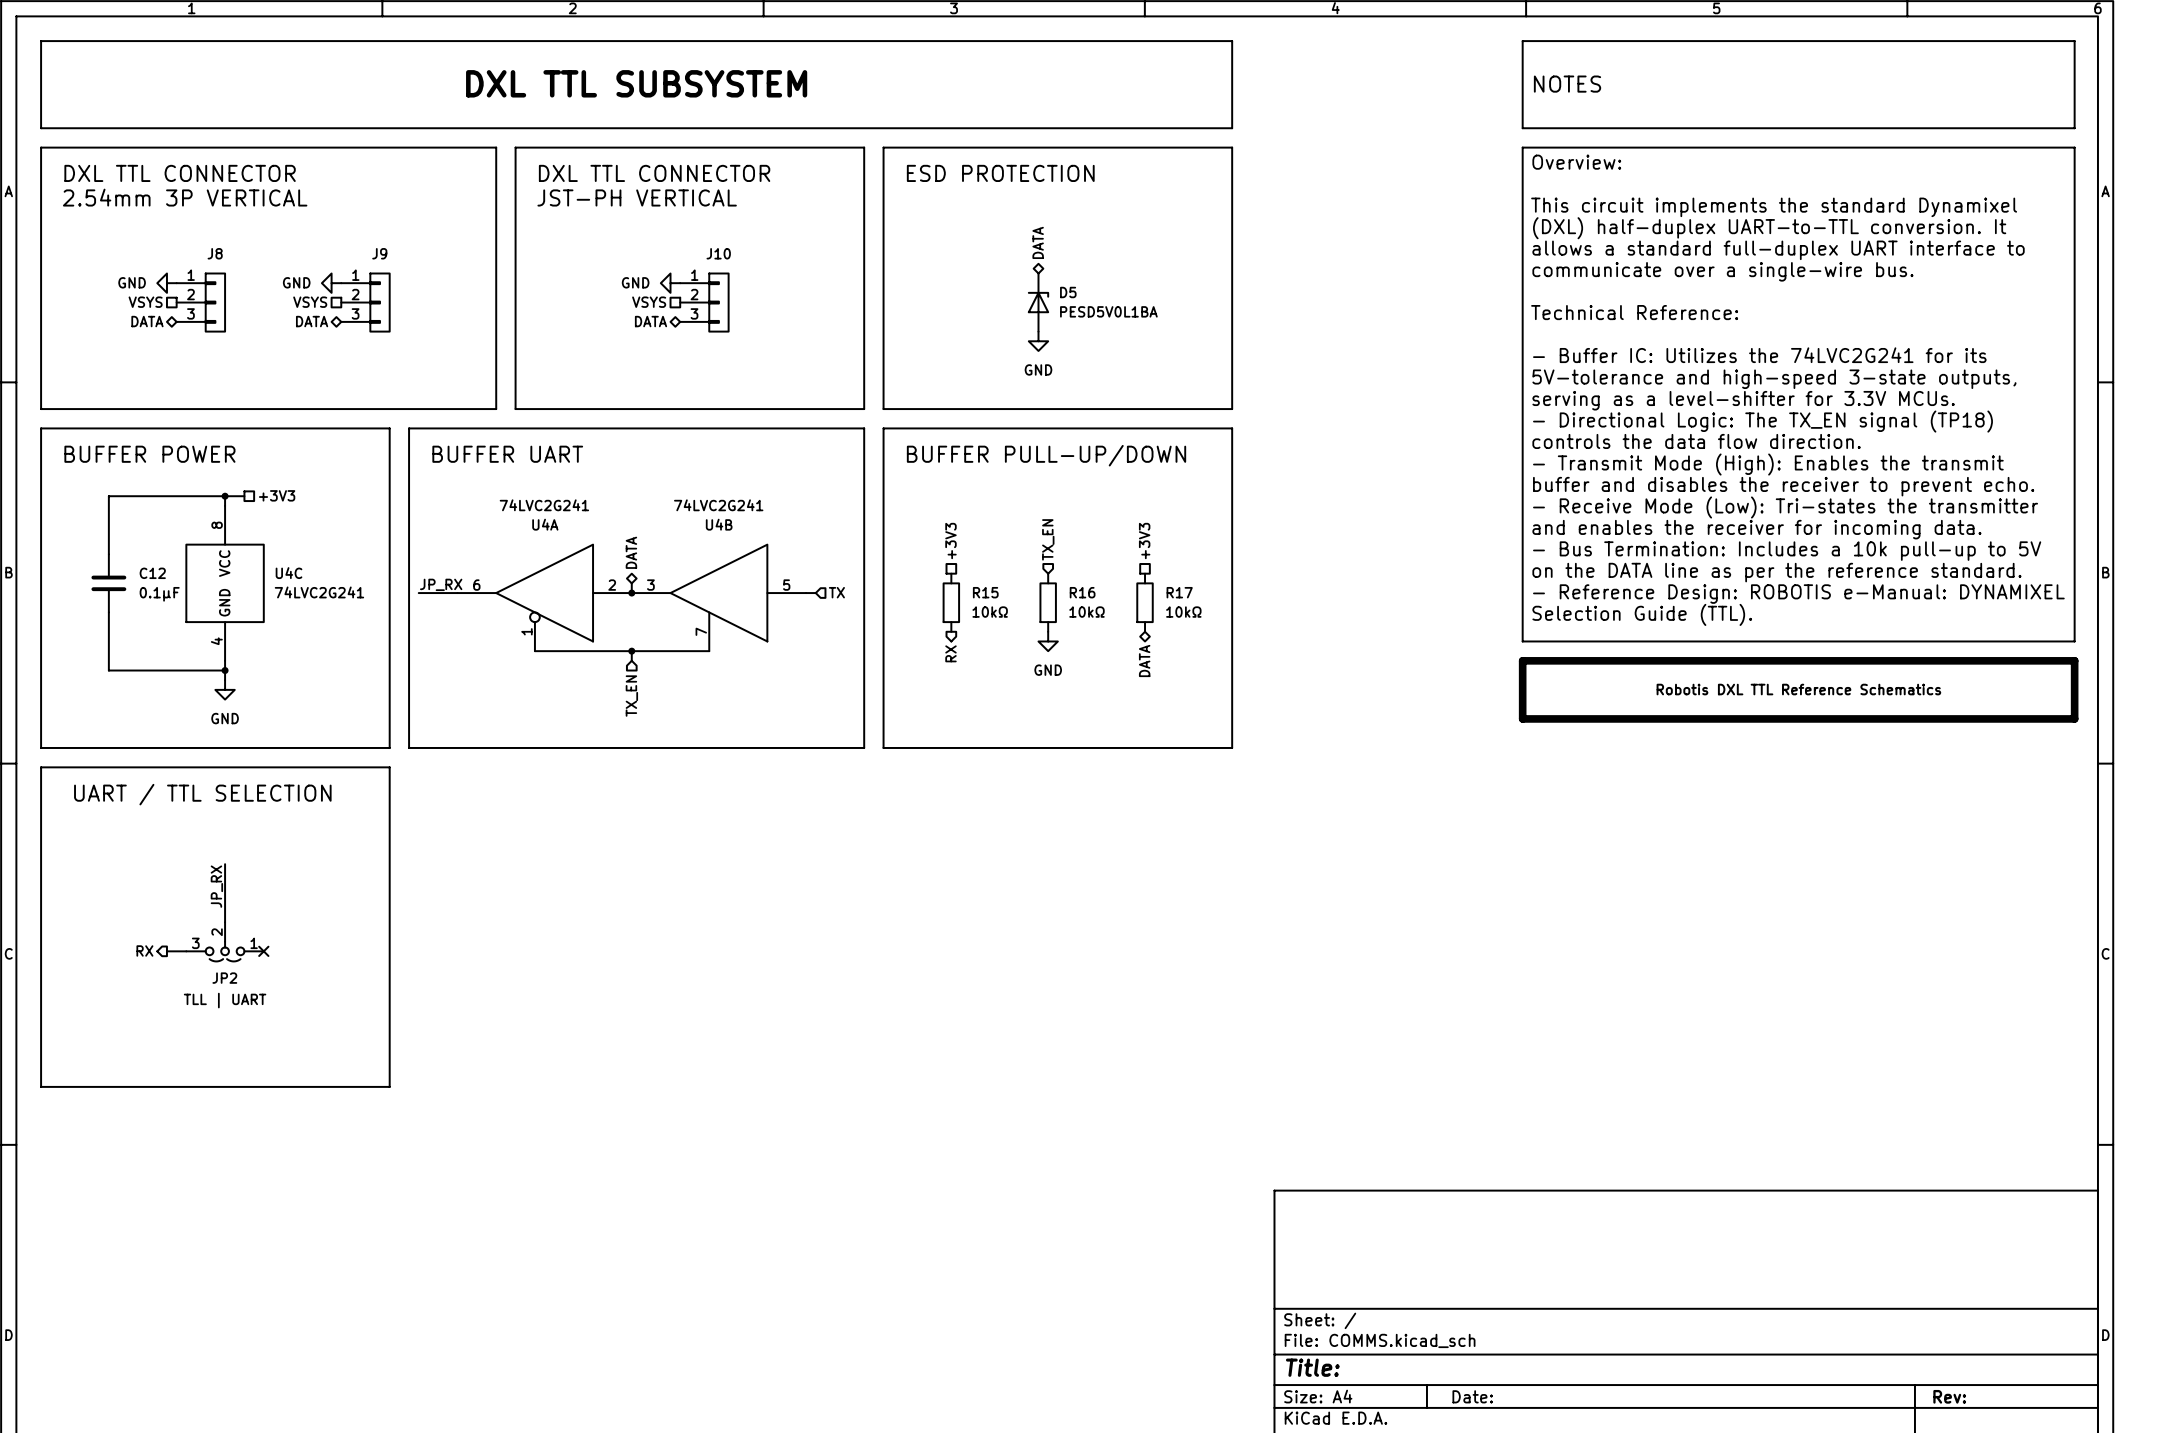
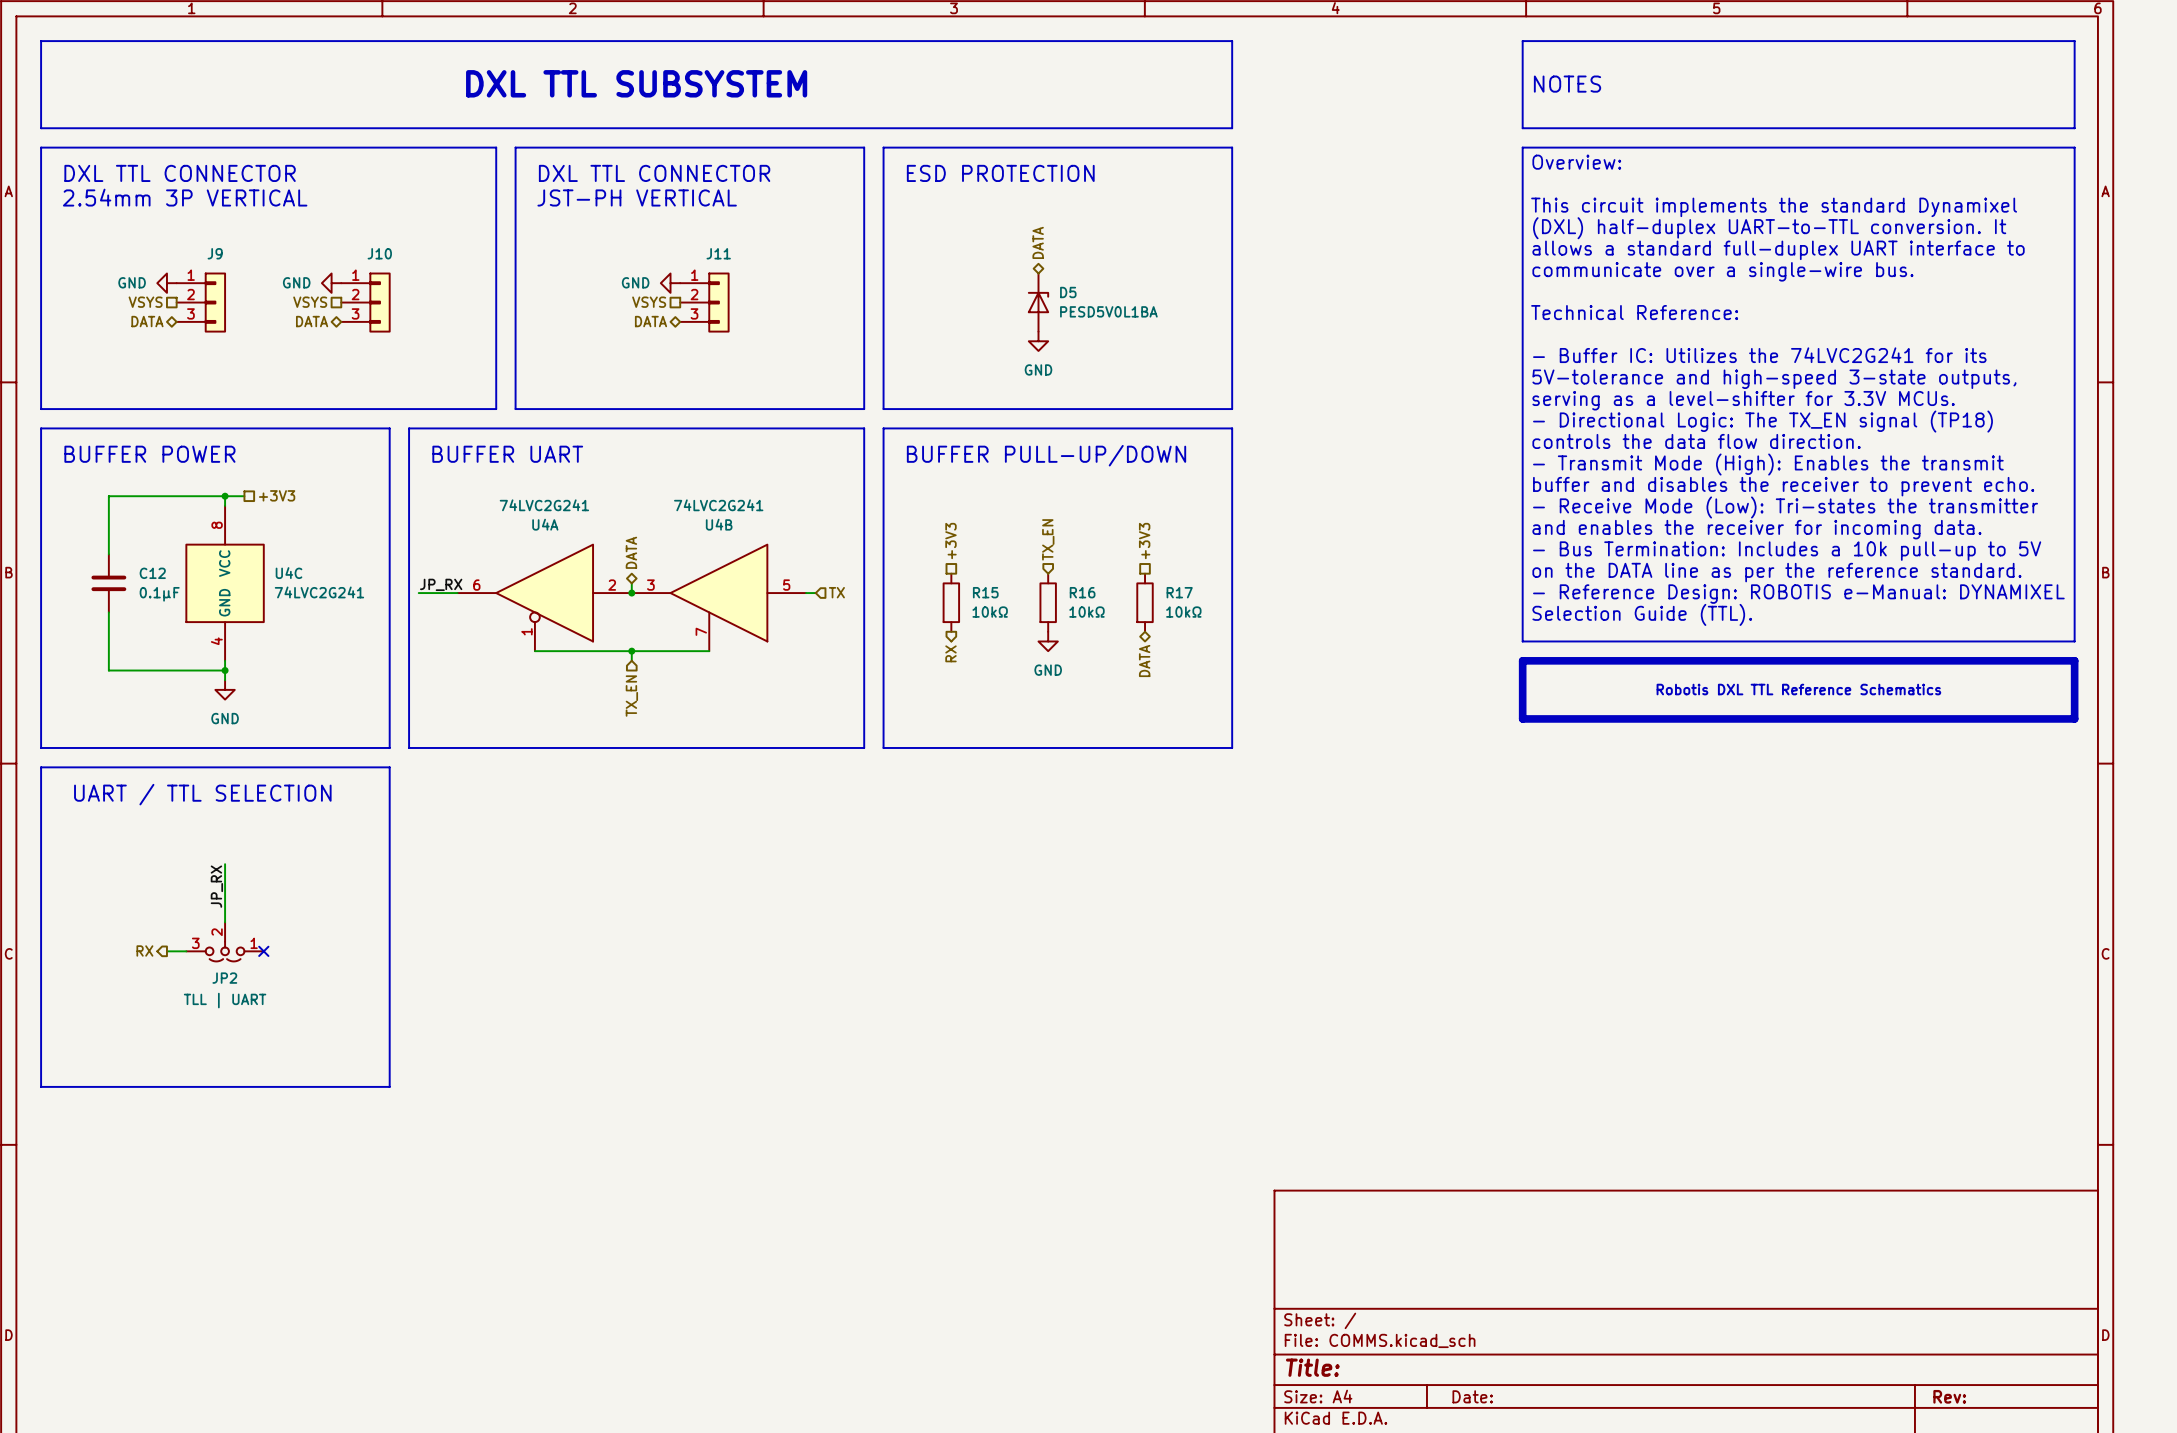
J8 name: J8 (215, 253) -> J9 (215, 253)
J9 name: J9 (379, 253) -> J10 (379, 253)
J10 name: J10 (718, 253) -> J11 (718, 253)

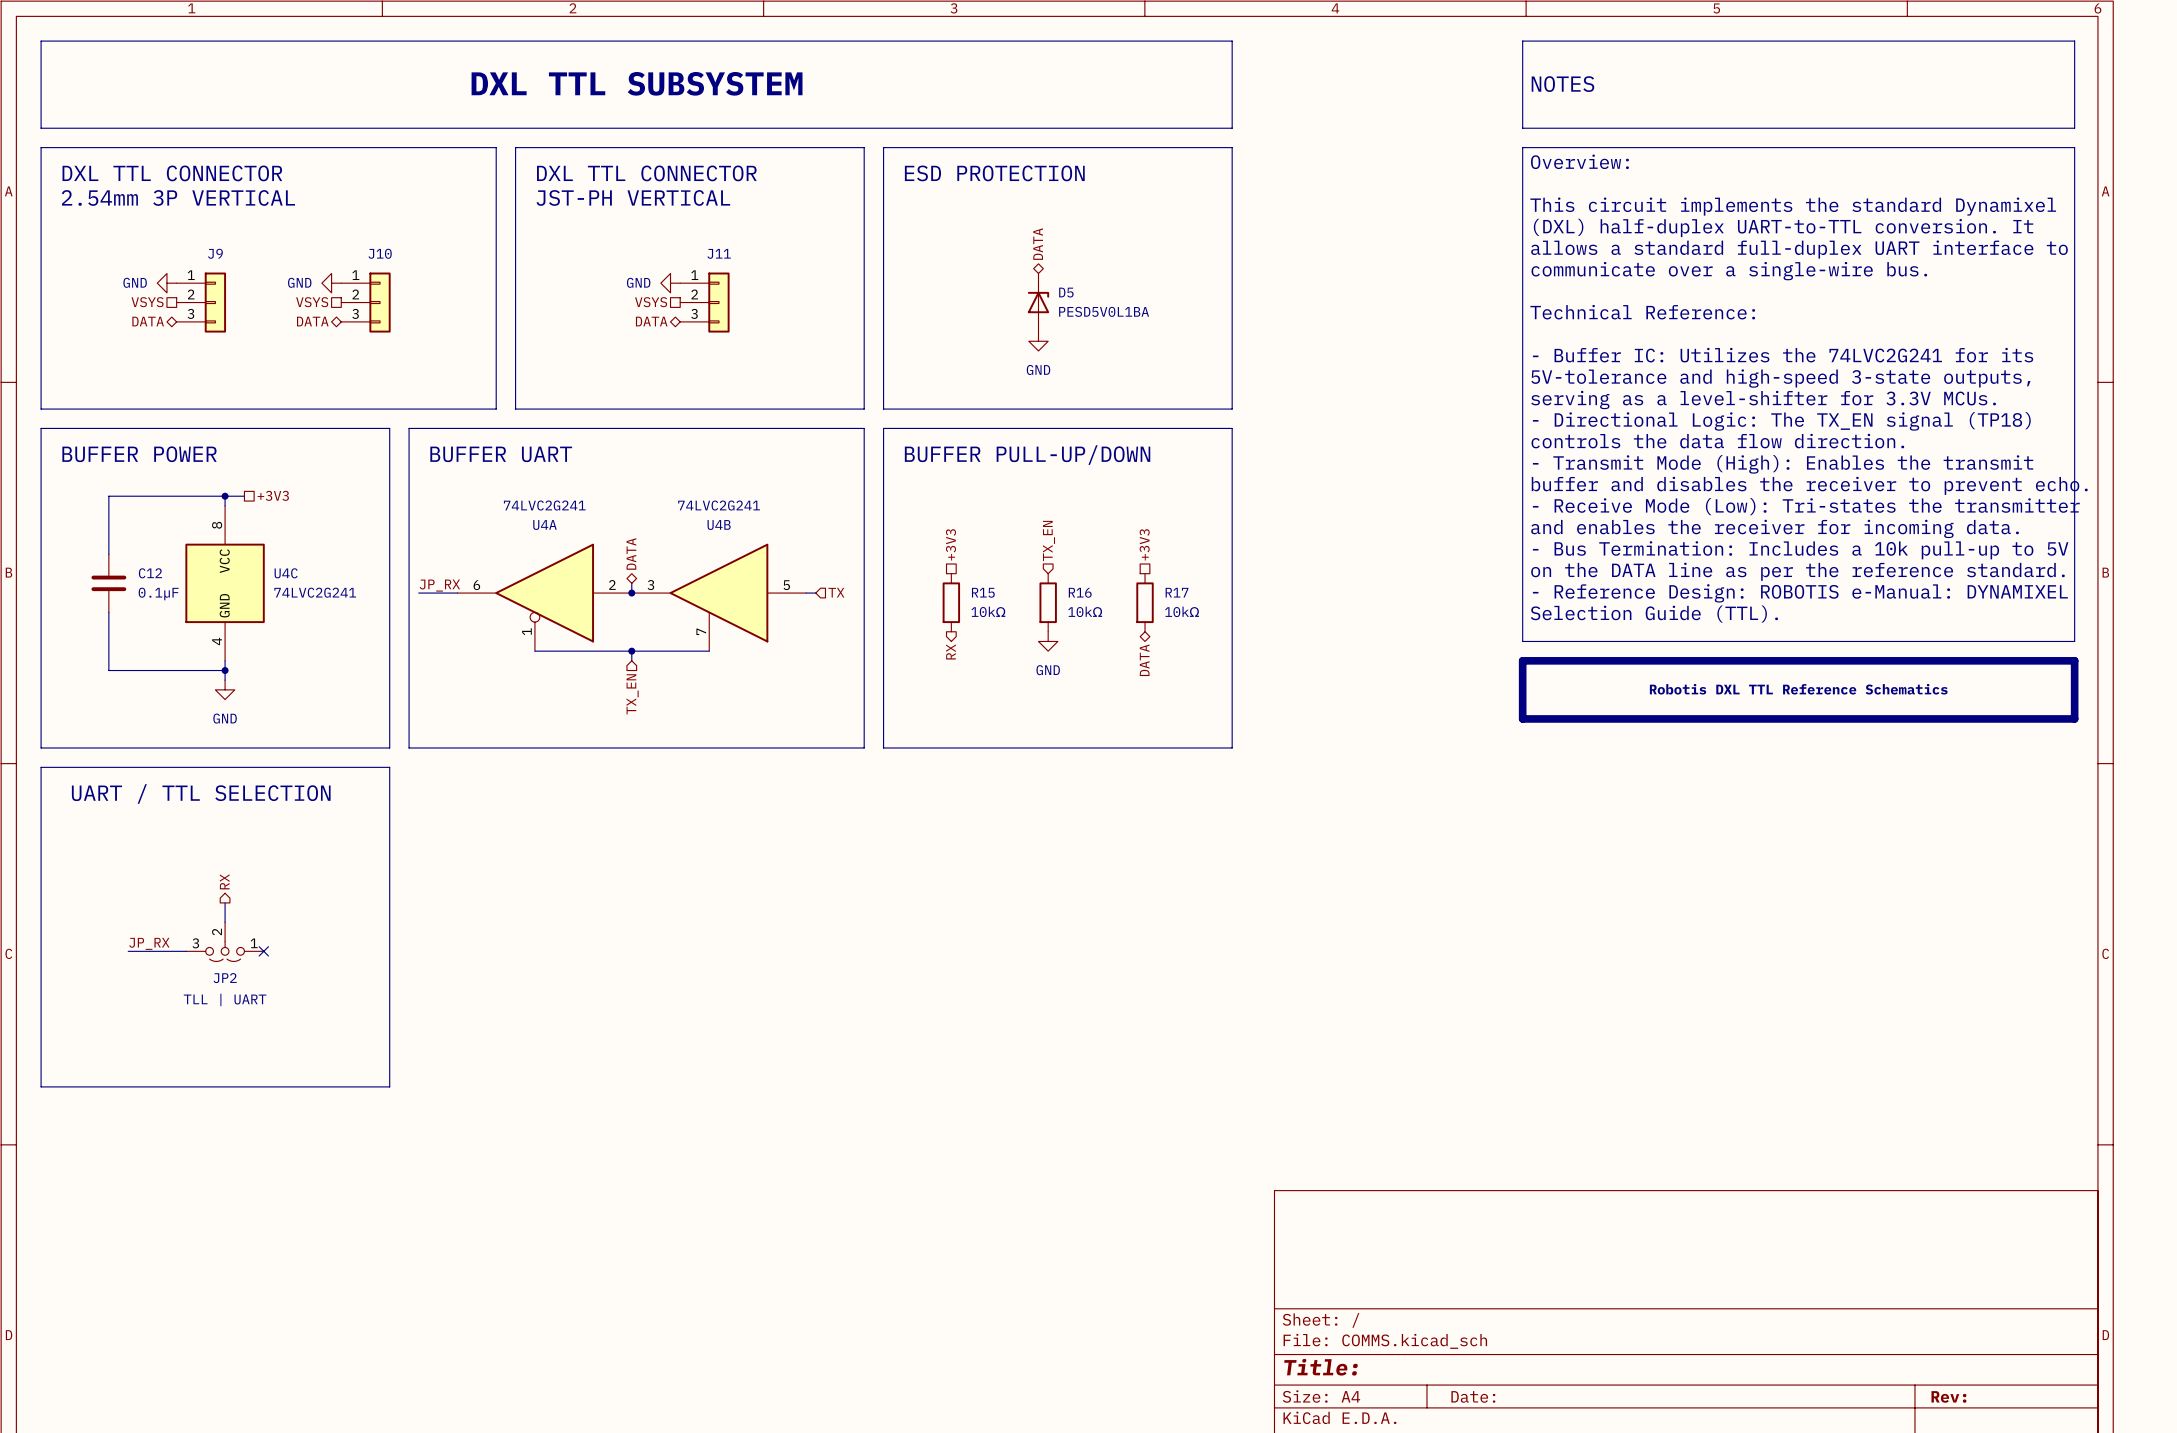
wire: (225, 864) (225, 902) -> none
label rotation: 0° (216, 886) -> 90° clockwise (149, 943)
label position: JP_RX (216, 886) -> JP_RX (149, 943)
hierarchical label rotation: 0° (144, 950) -> 90° clockwise (224, 881)
hierarchical label position: RX (144, 950) -> RX (224, 881)
wire: none -> (128, 951) (166, 951)

